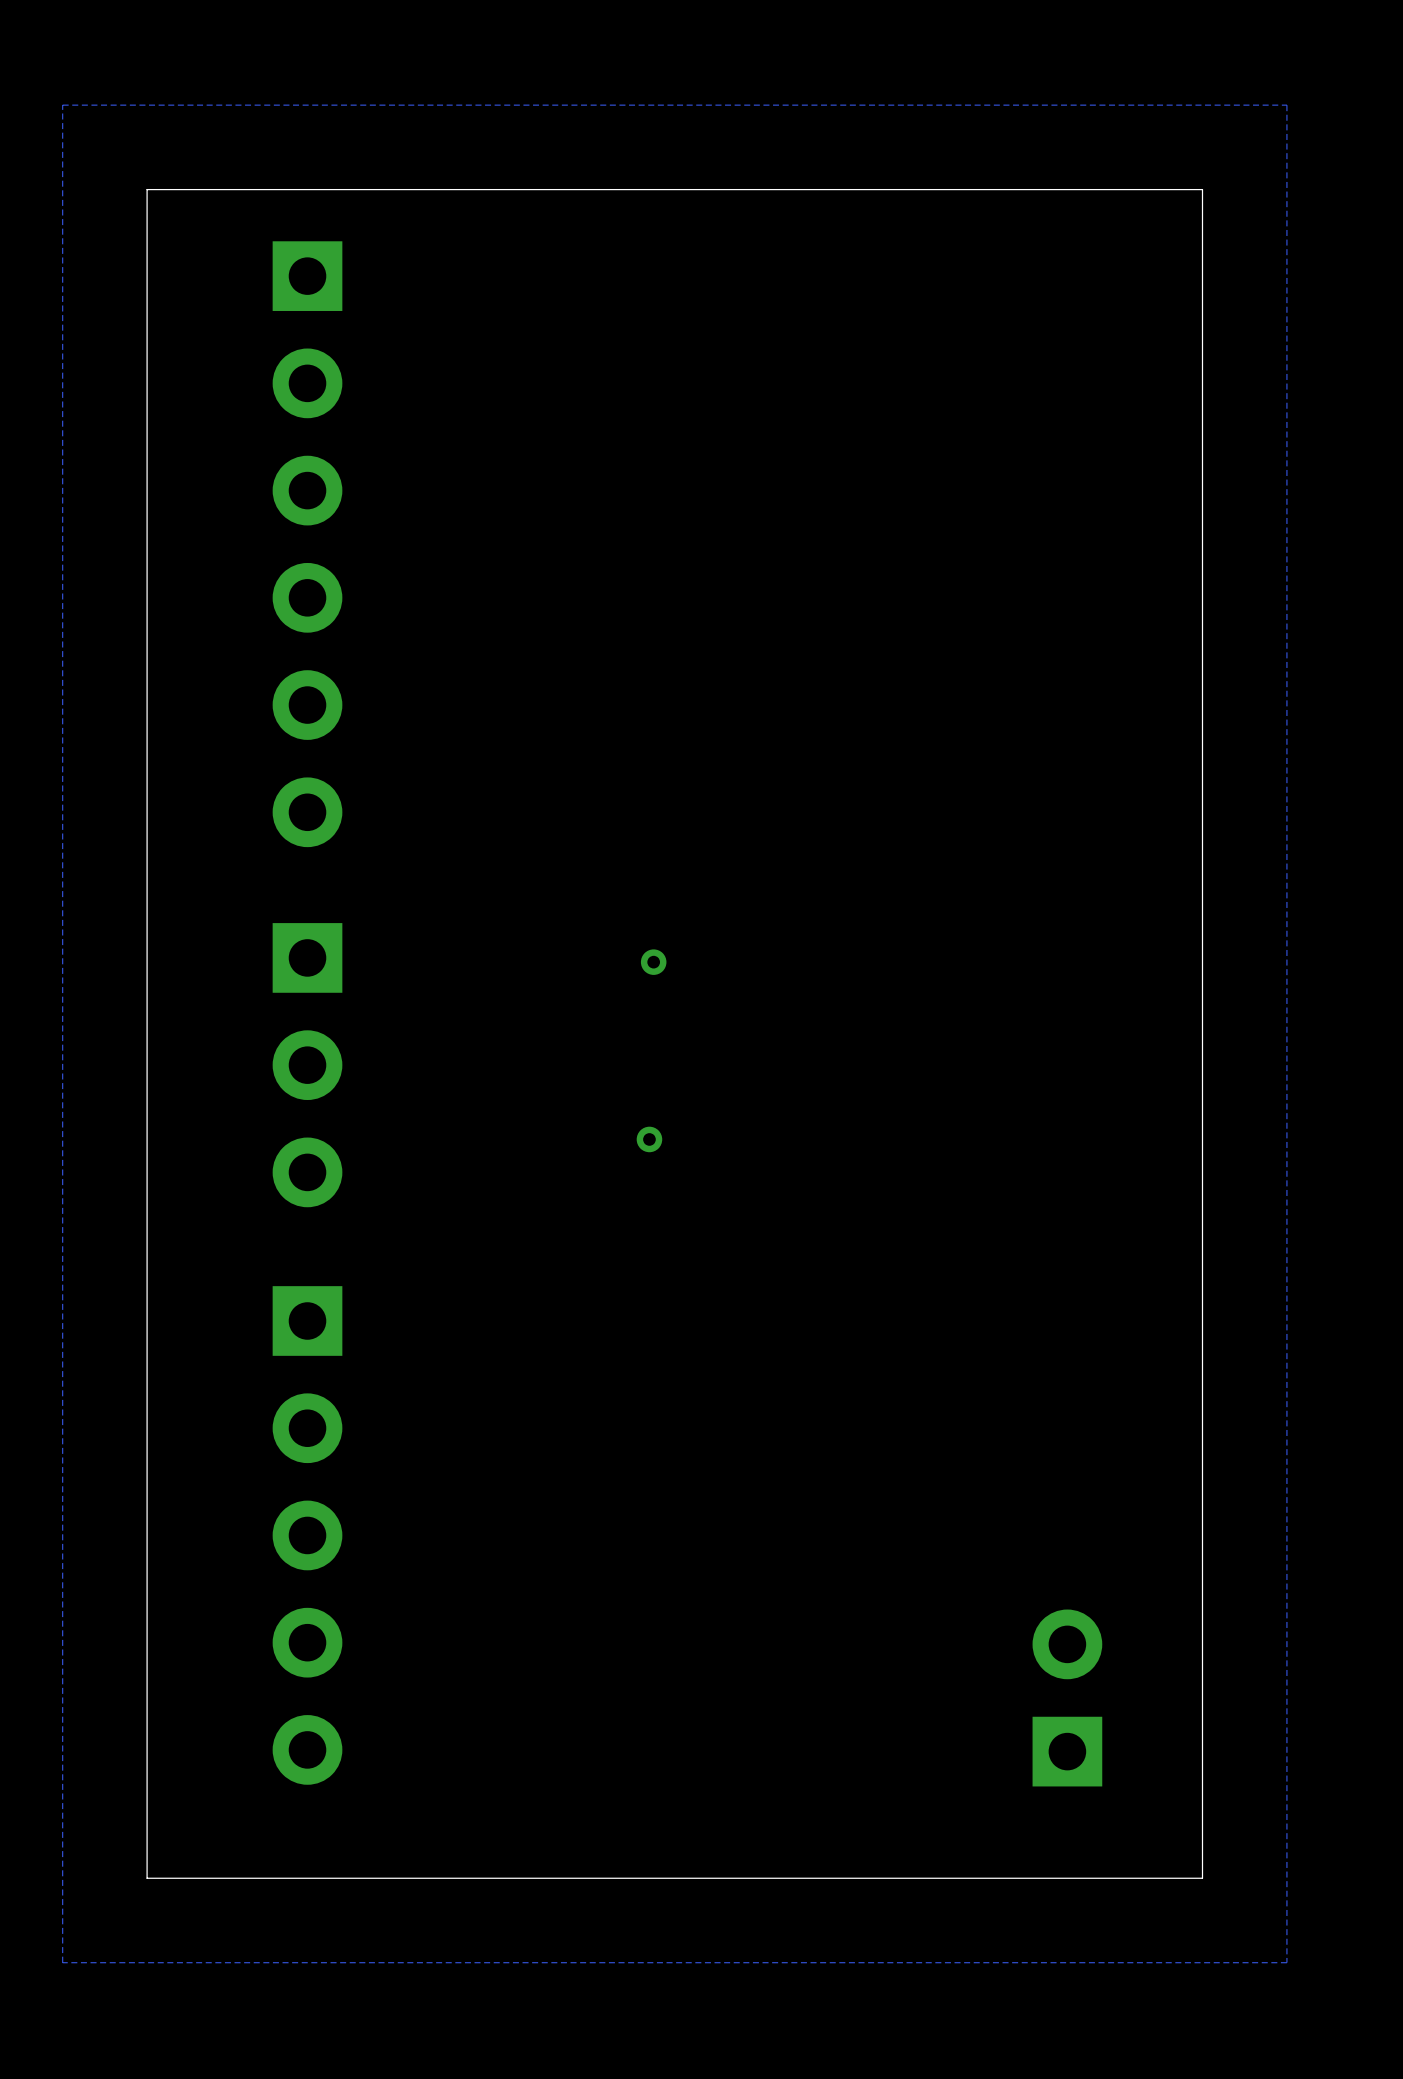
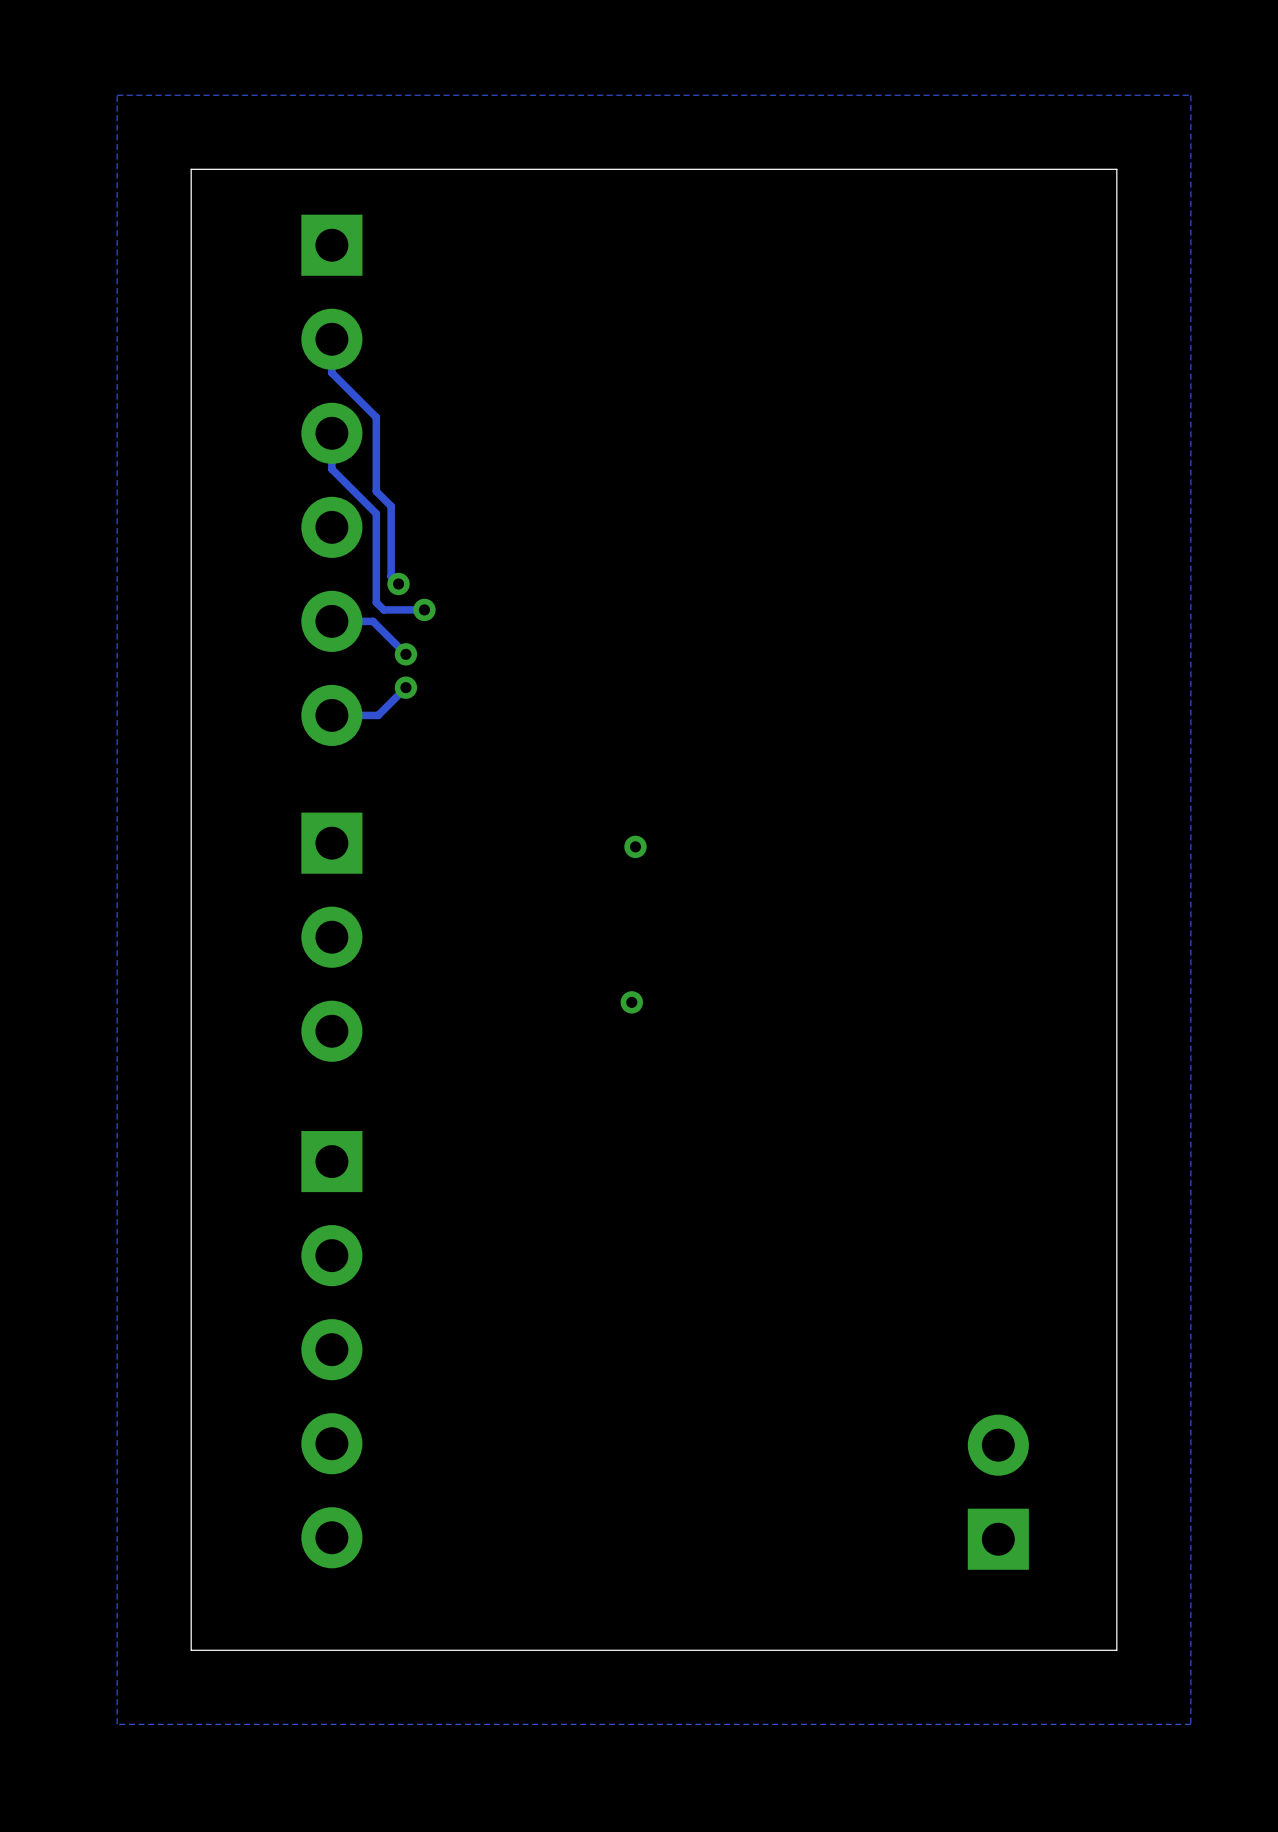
track: none -> (331, 339) (331, 372) (376, 417) (376, 491) (391, 506) (391, 576) (398, 583)
track: none -> (331, 433) (331, 469) (376, 513) (376, 602) (383, 609) (424, 609)
via: none -> (398, 583)
via: none -> (424, 609)
track: none -> (331, 621) (372, 621) (405, 654)
via: none -> (405, 654)
track: none -> (405, 687) (378, 715) (331, 715)
via: none -> (405, 687)

